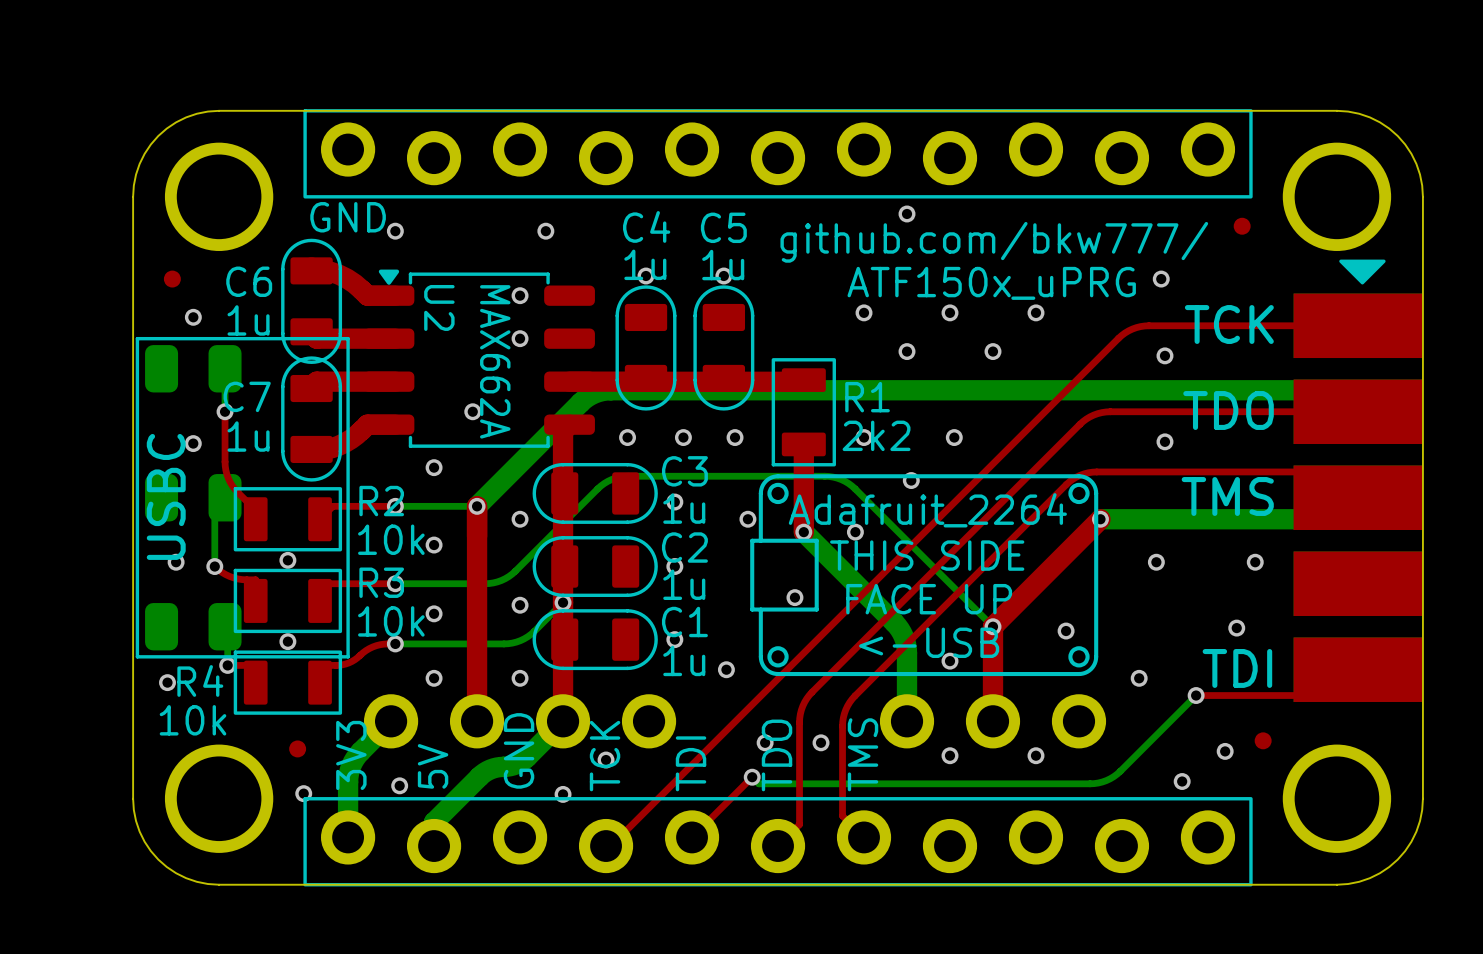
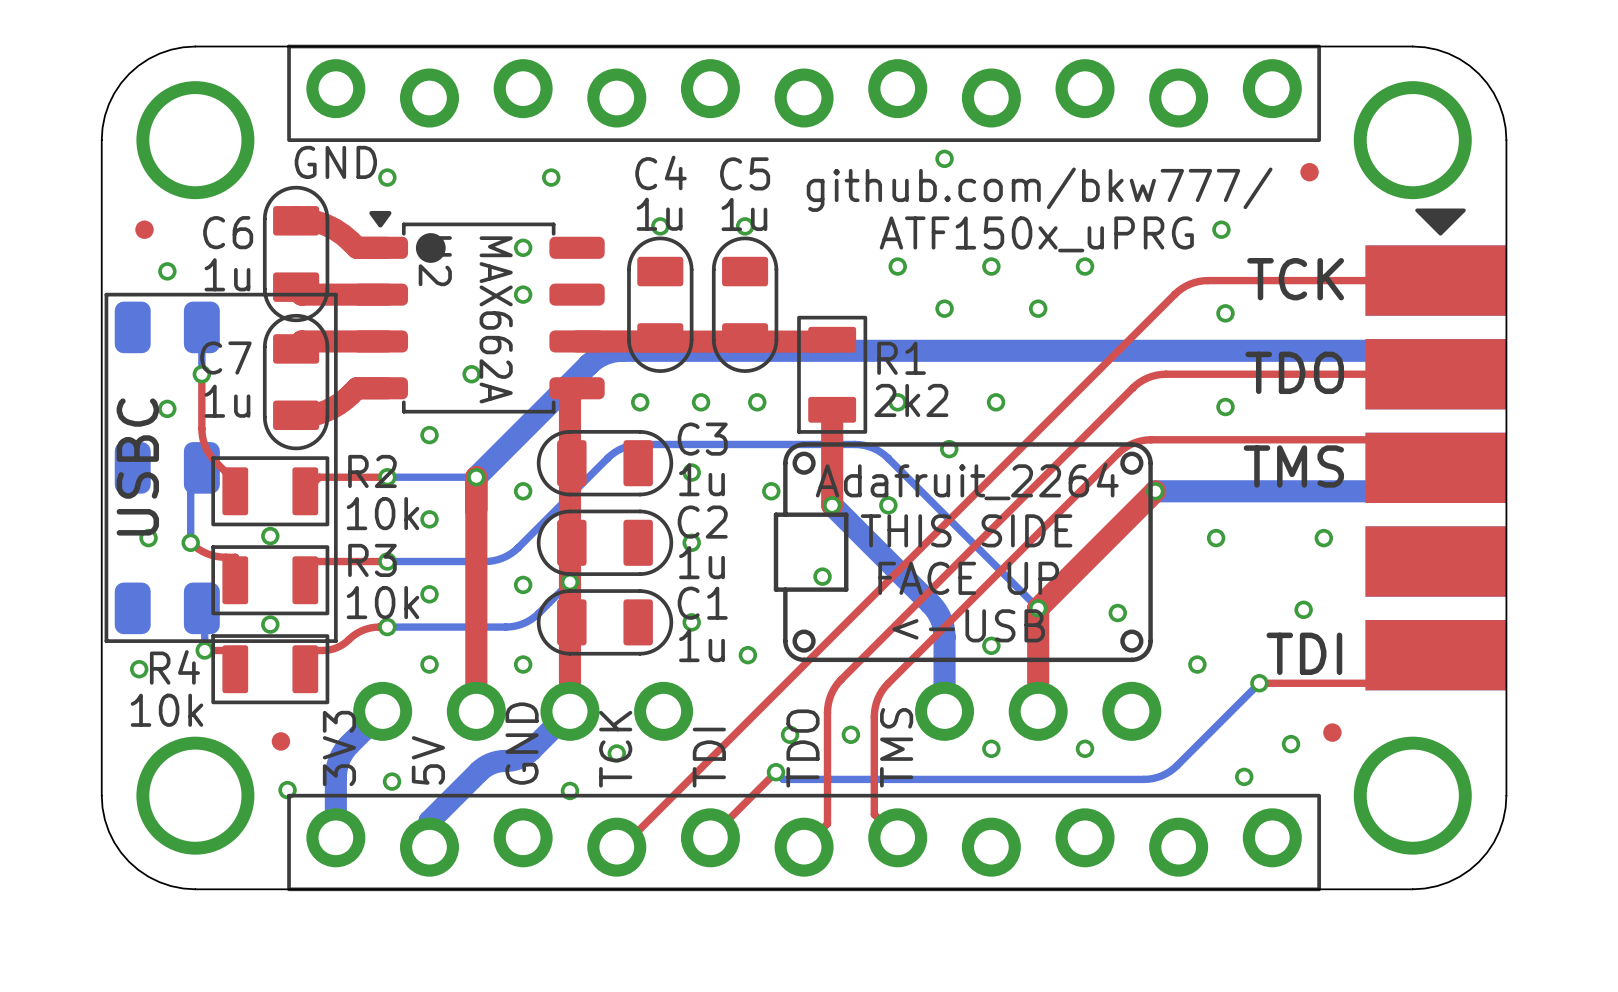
U2 footprint: [363, 269, 595, 448] -> [352, 210, 605, 414]

